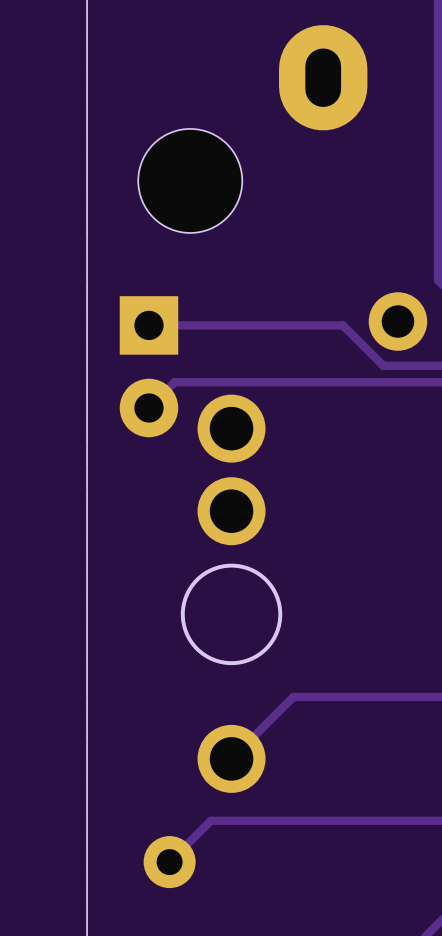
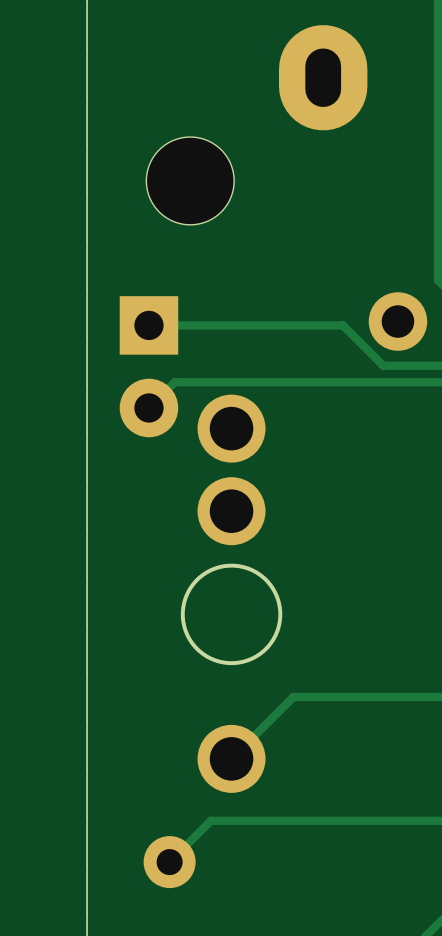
part footprint: [138, 128, 243, 233] -> [146, 137, 235, 225]

